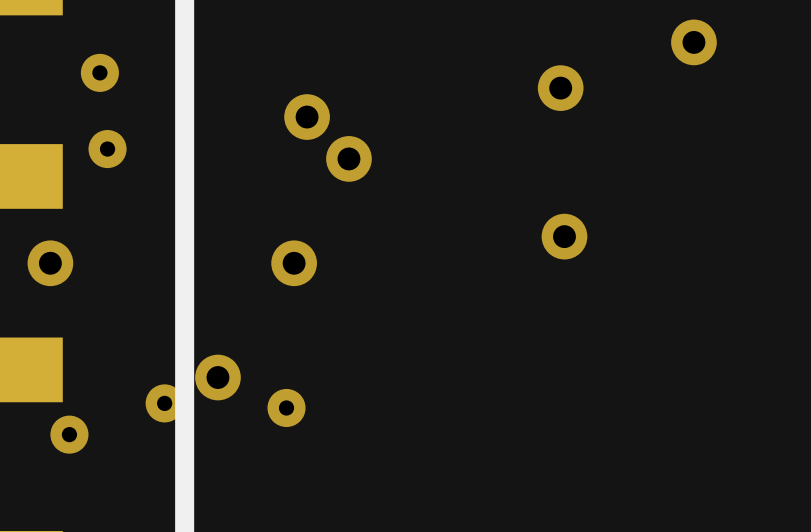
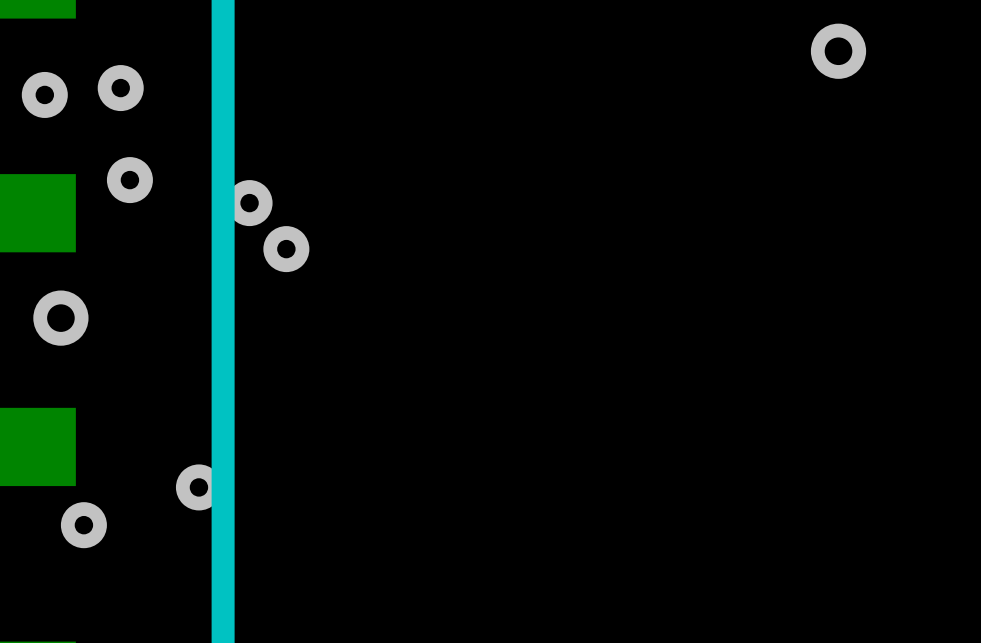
via: none -> (44, 94)
via: (560, 88) -> none
via: (307, 117) -> none
via: (348, 158) -> none
via: none -> (249, 203)
via: none -> (286, 249)
via: (564, 236) -> none
via: (294, 263) -> none
via: (217, 377) -> none
via: (286, 407) -> none

